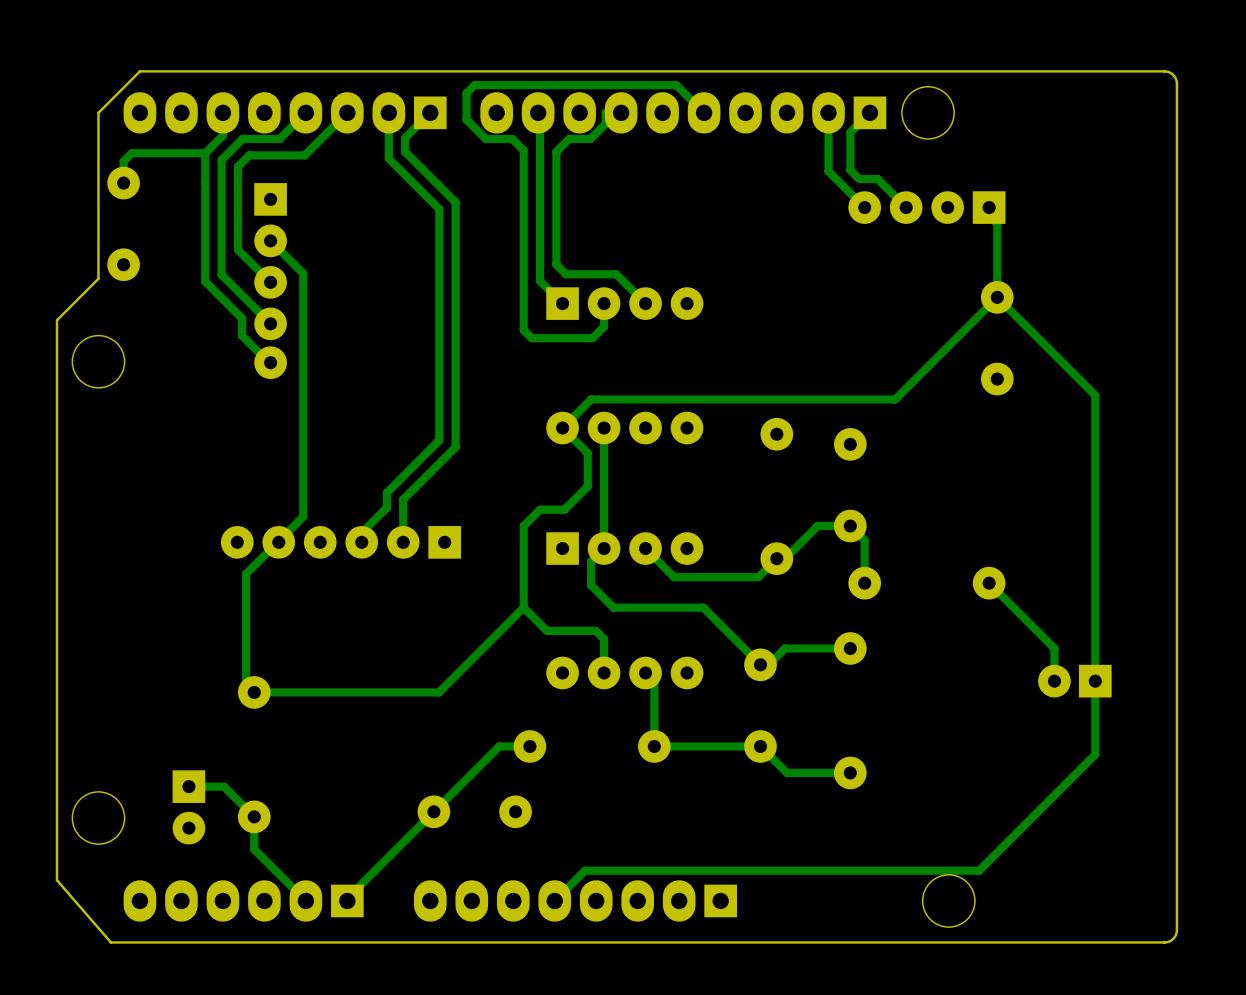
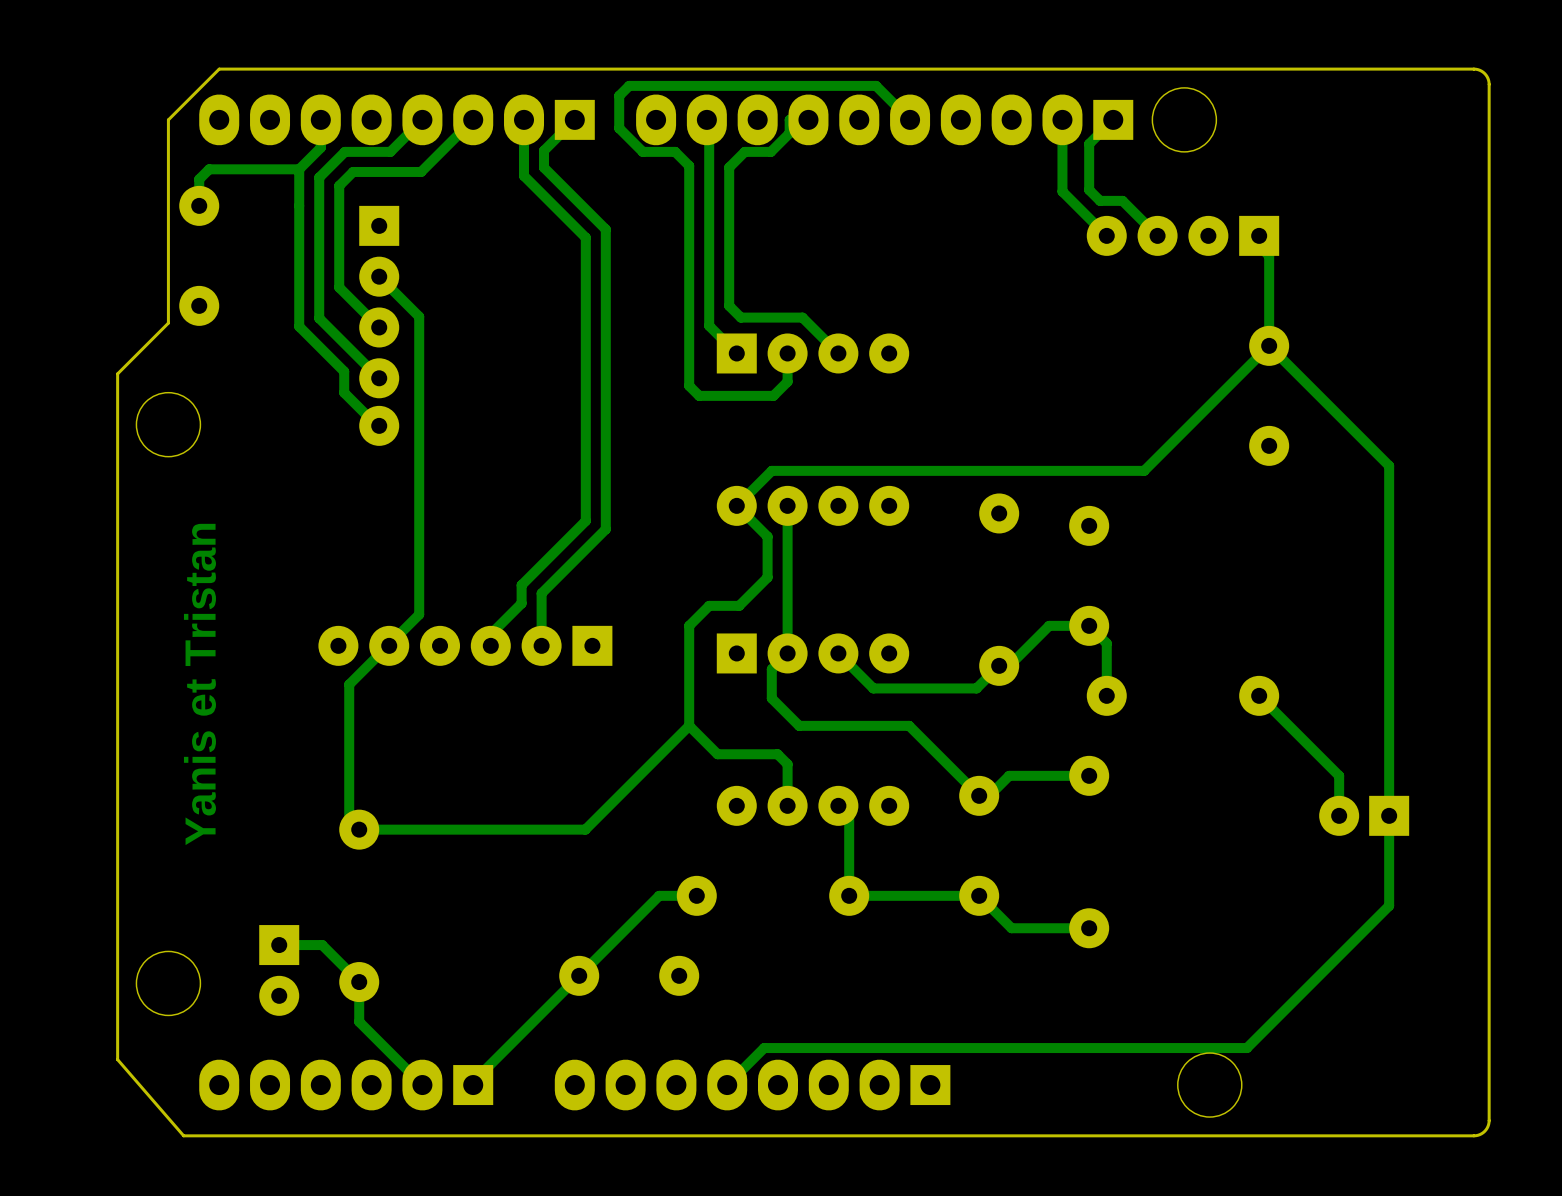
text: none -> Yanis et Tristan (199, 684)

